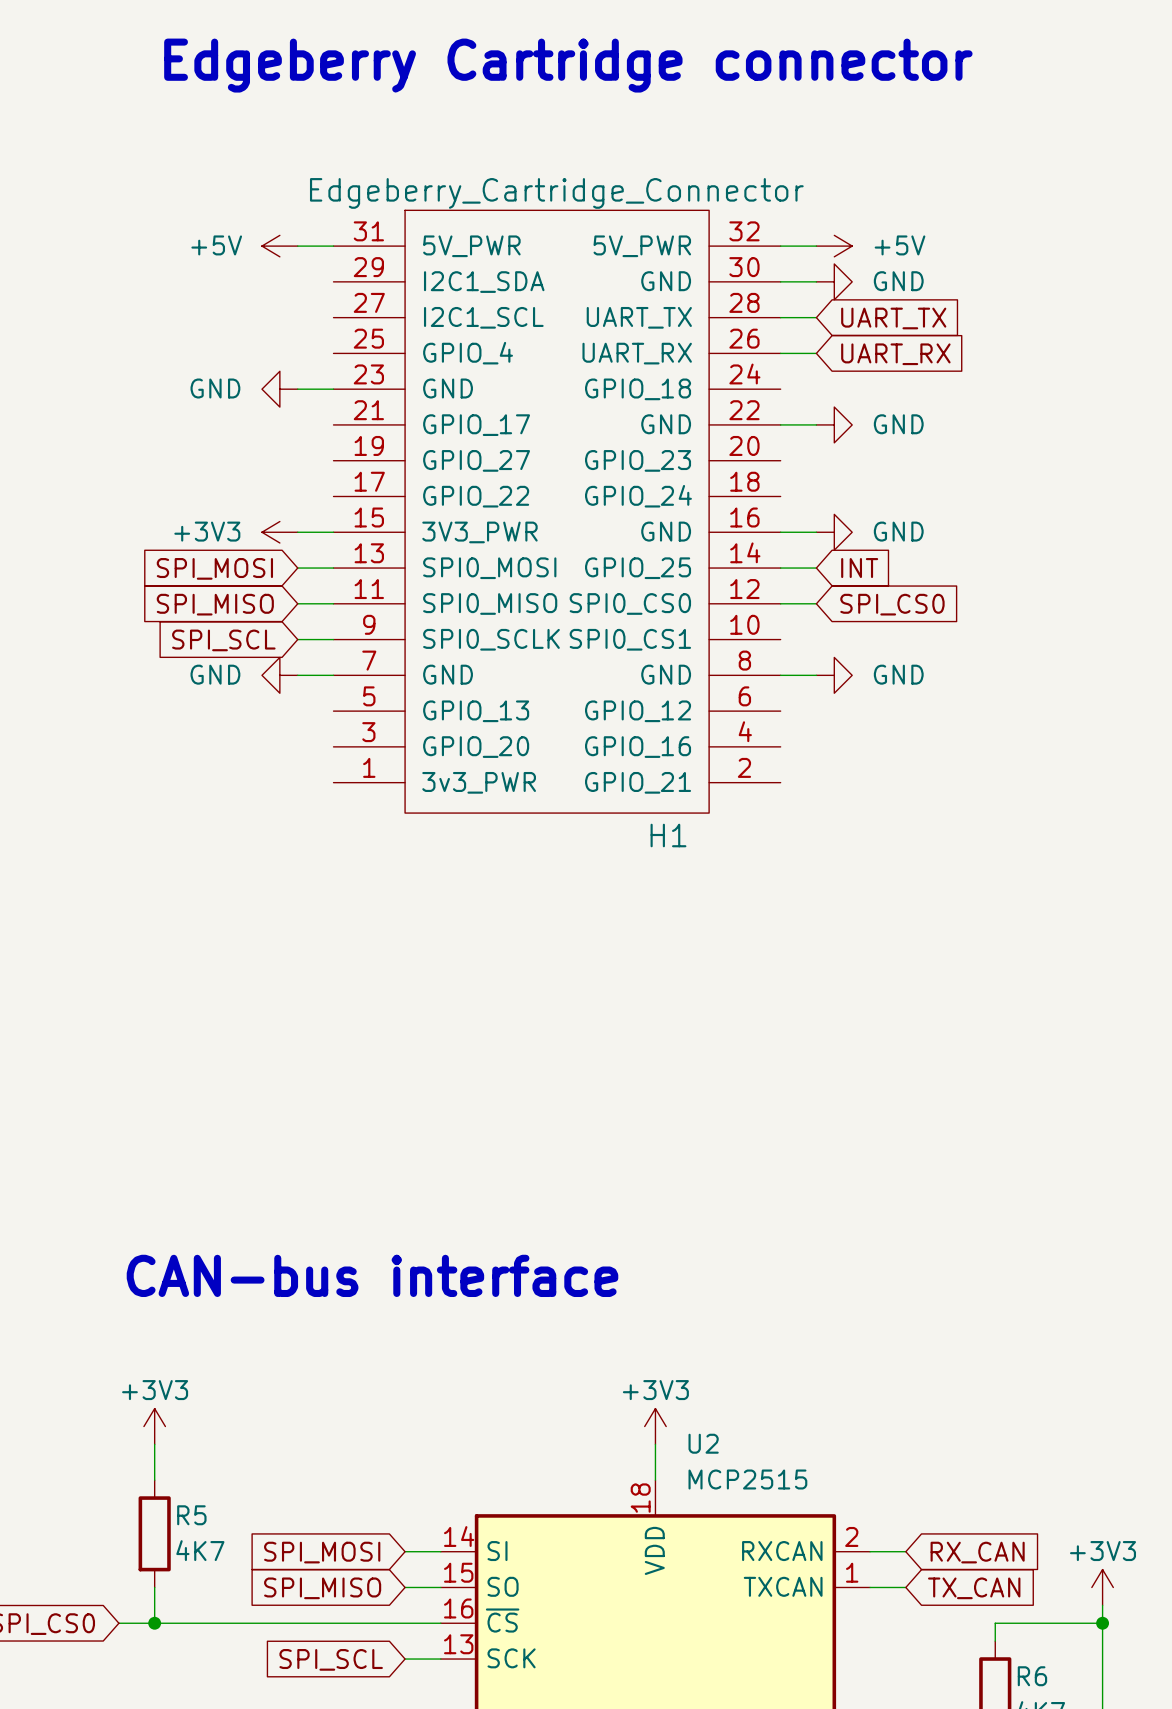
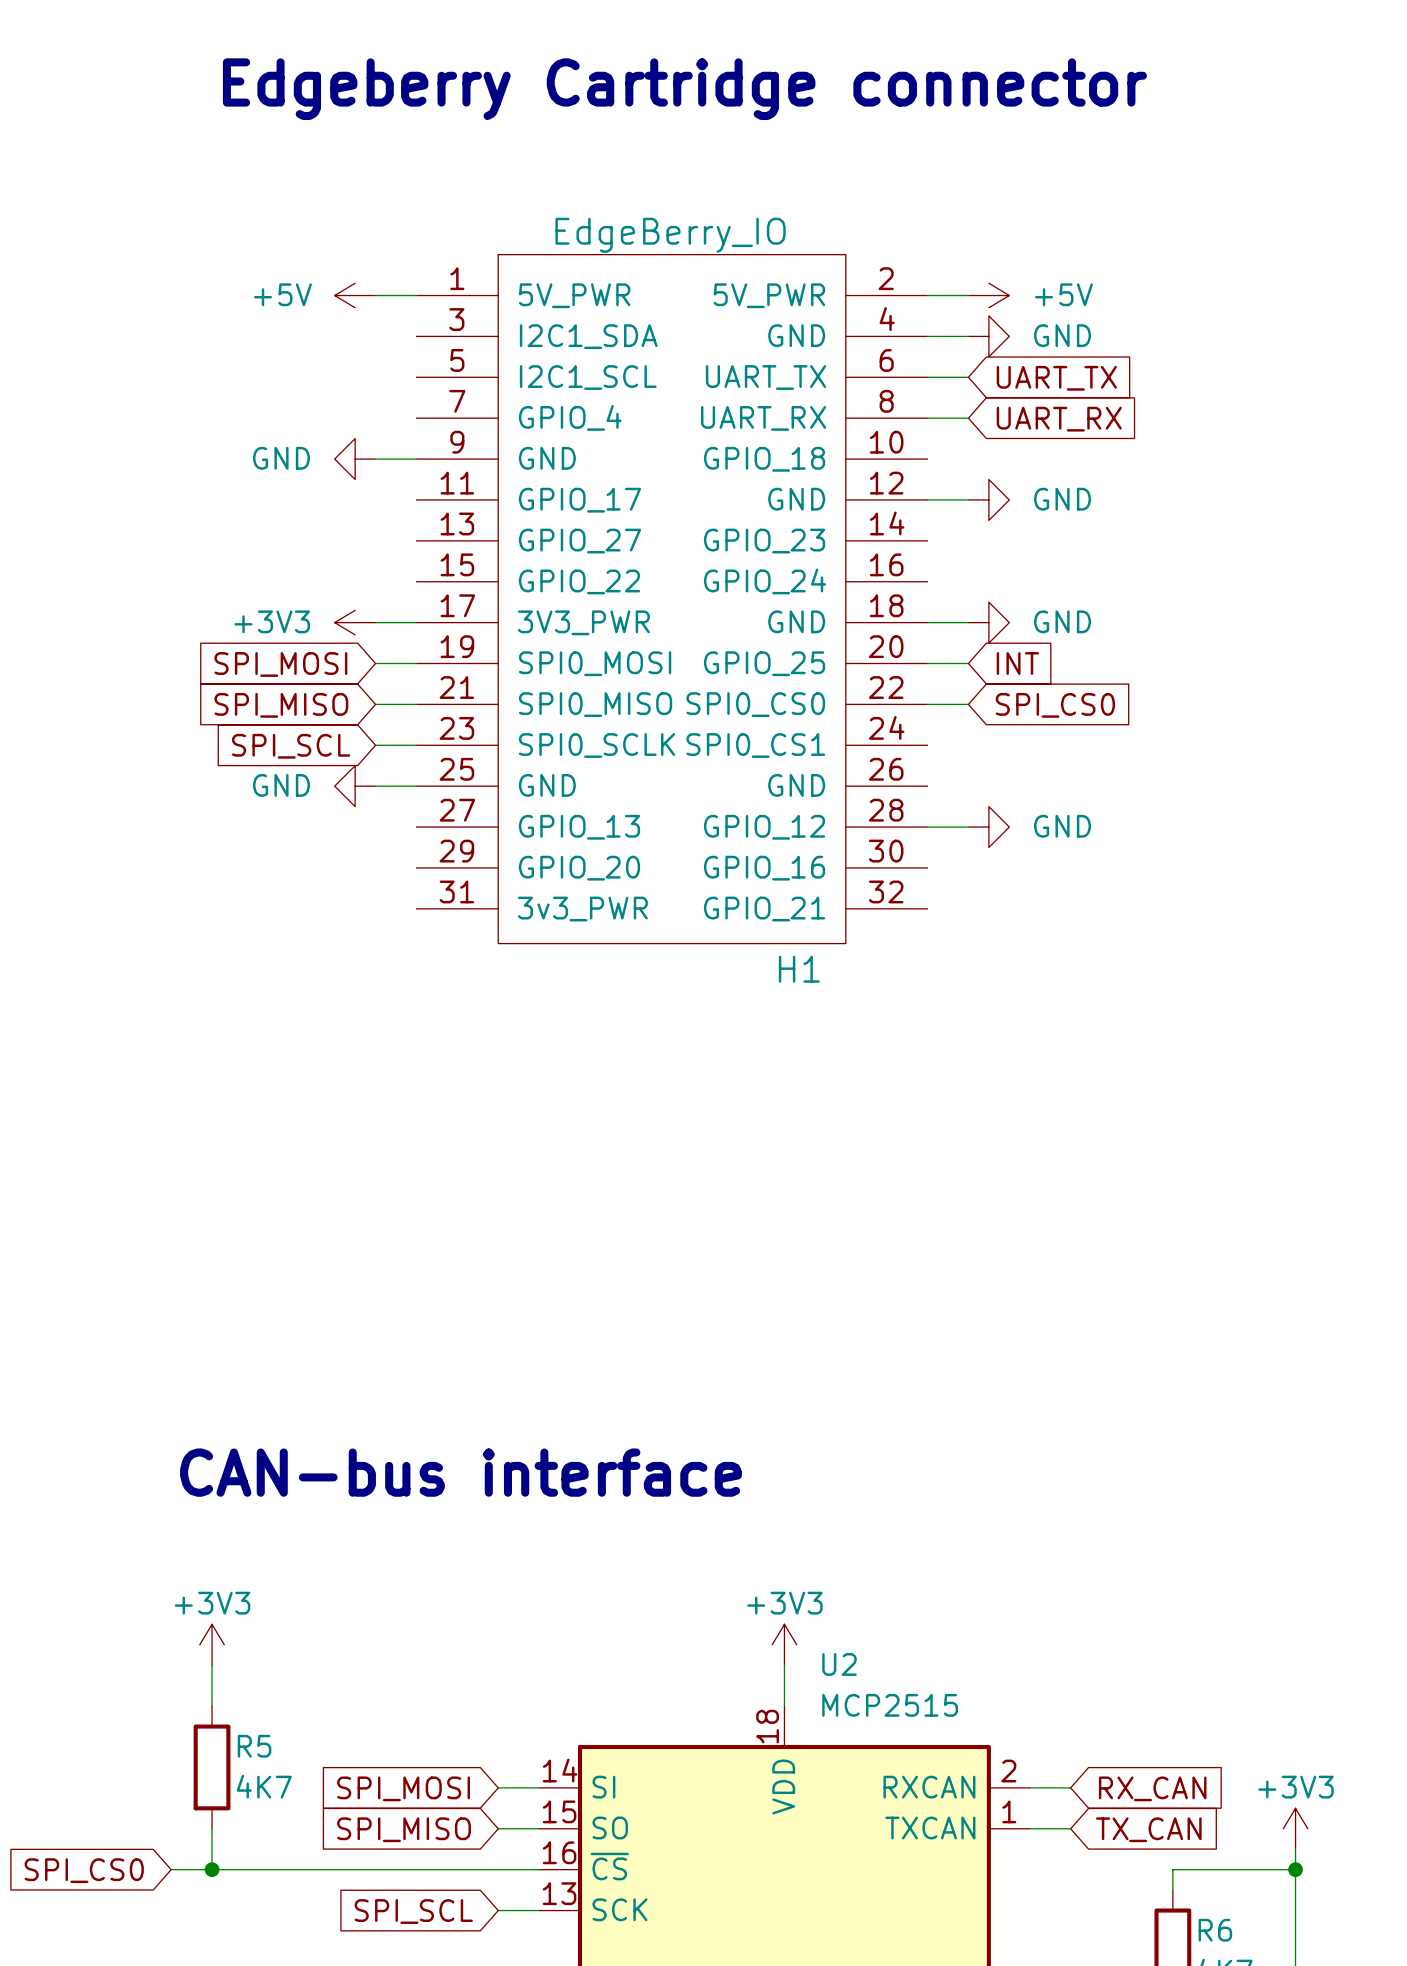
H1 value: Edgeberry_Cartridge_Connector (556, 193) -> EdgeBerry_IO (670, 235)
H1 symbol: [333, 210, 781, 814] -> [416, 254, 928, 944]
wire: (780, 675) (816, 675) -> (927, 827) (968, 827)
power symbol position: GND (834, 675) -> GND (988, 827)

